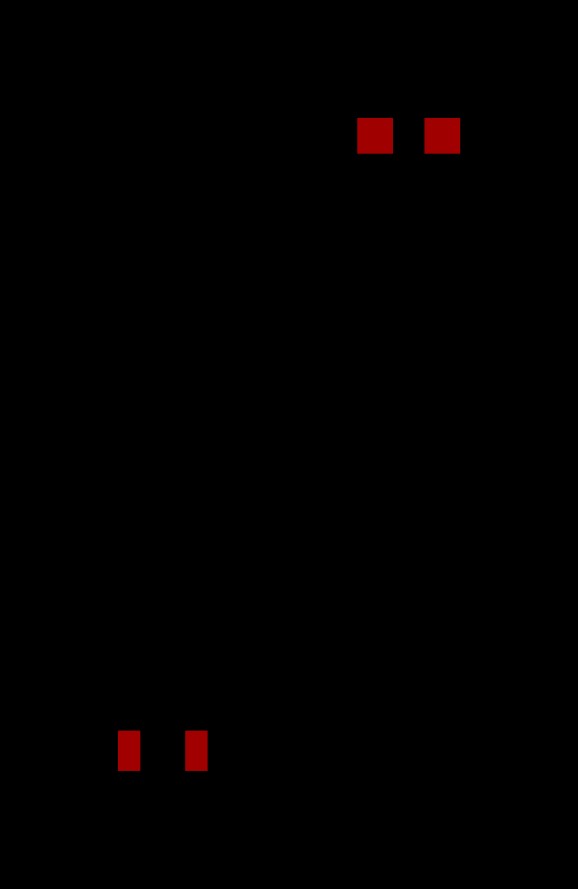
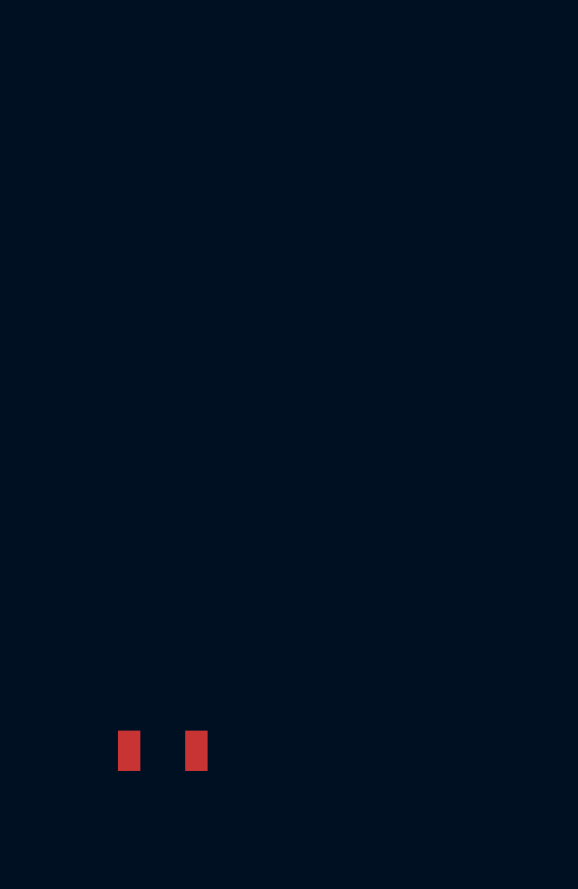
part: (408, 135) -> none

